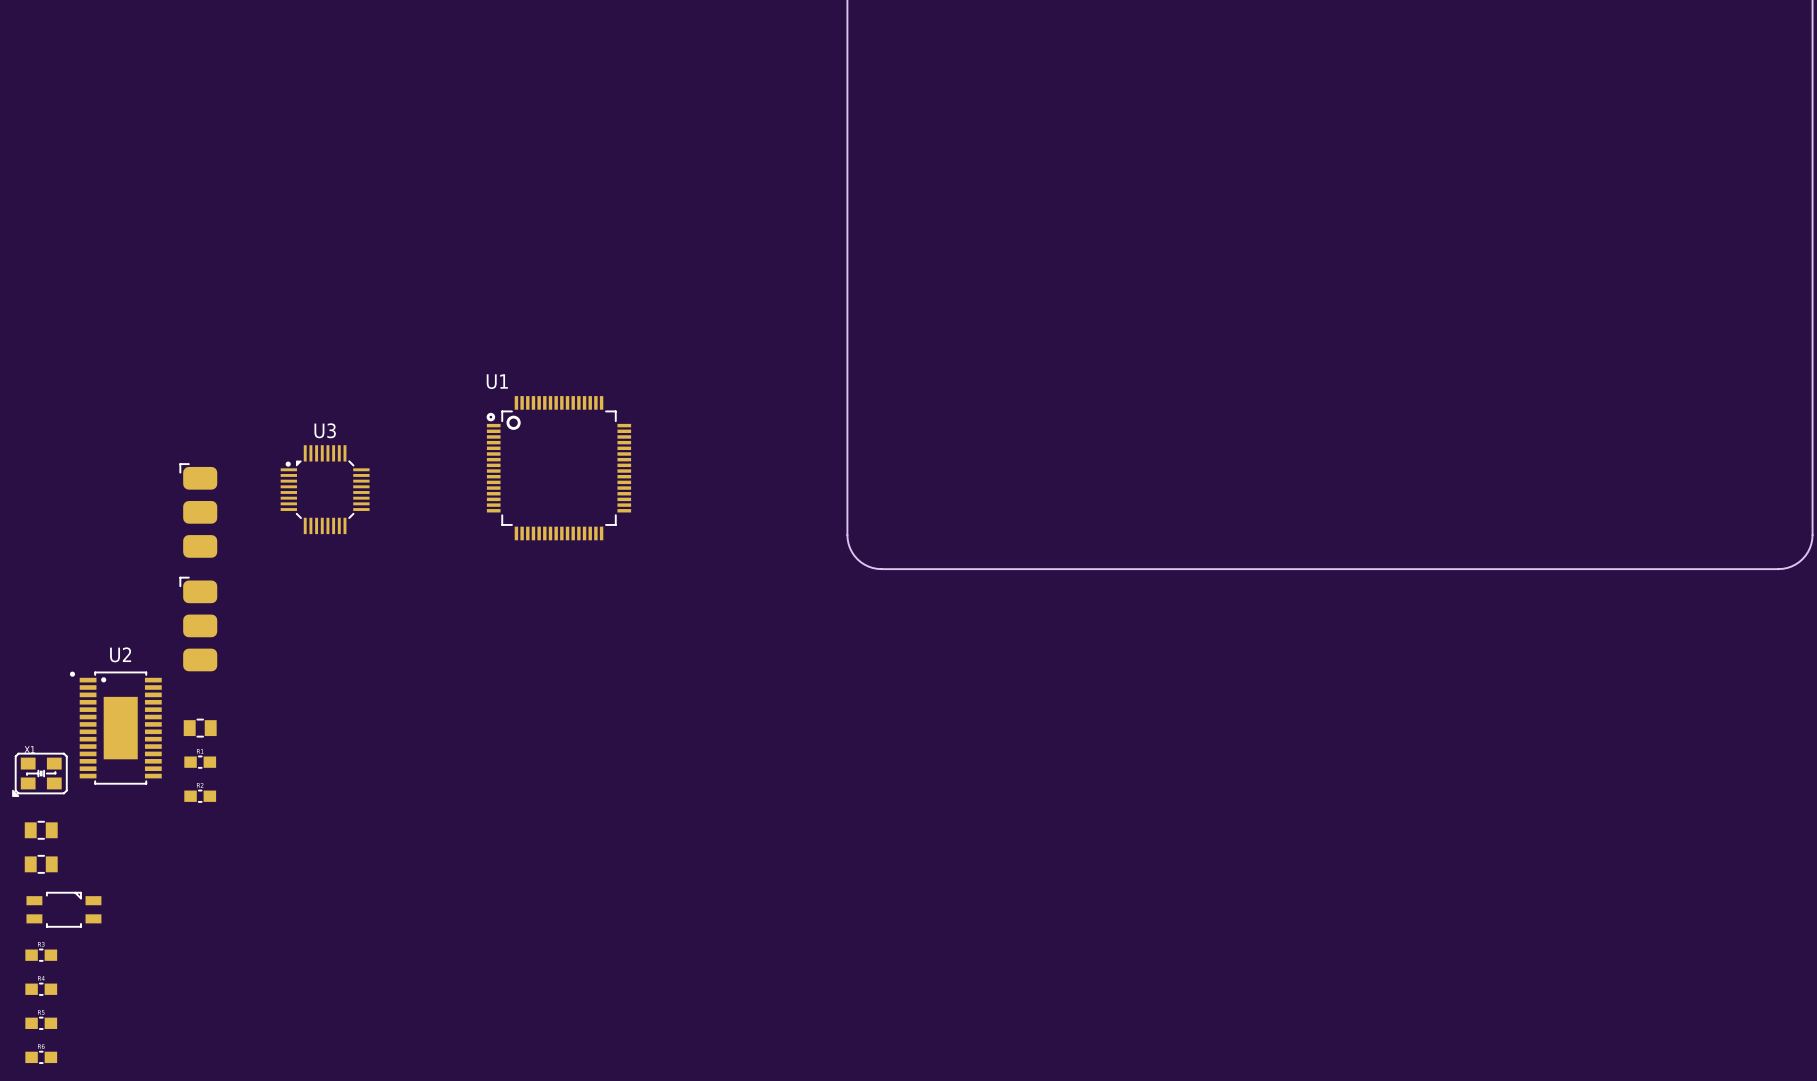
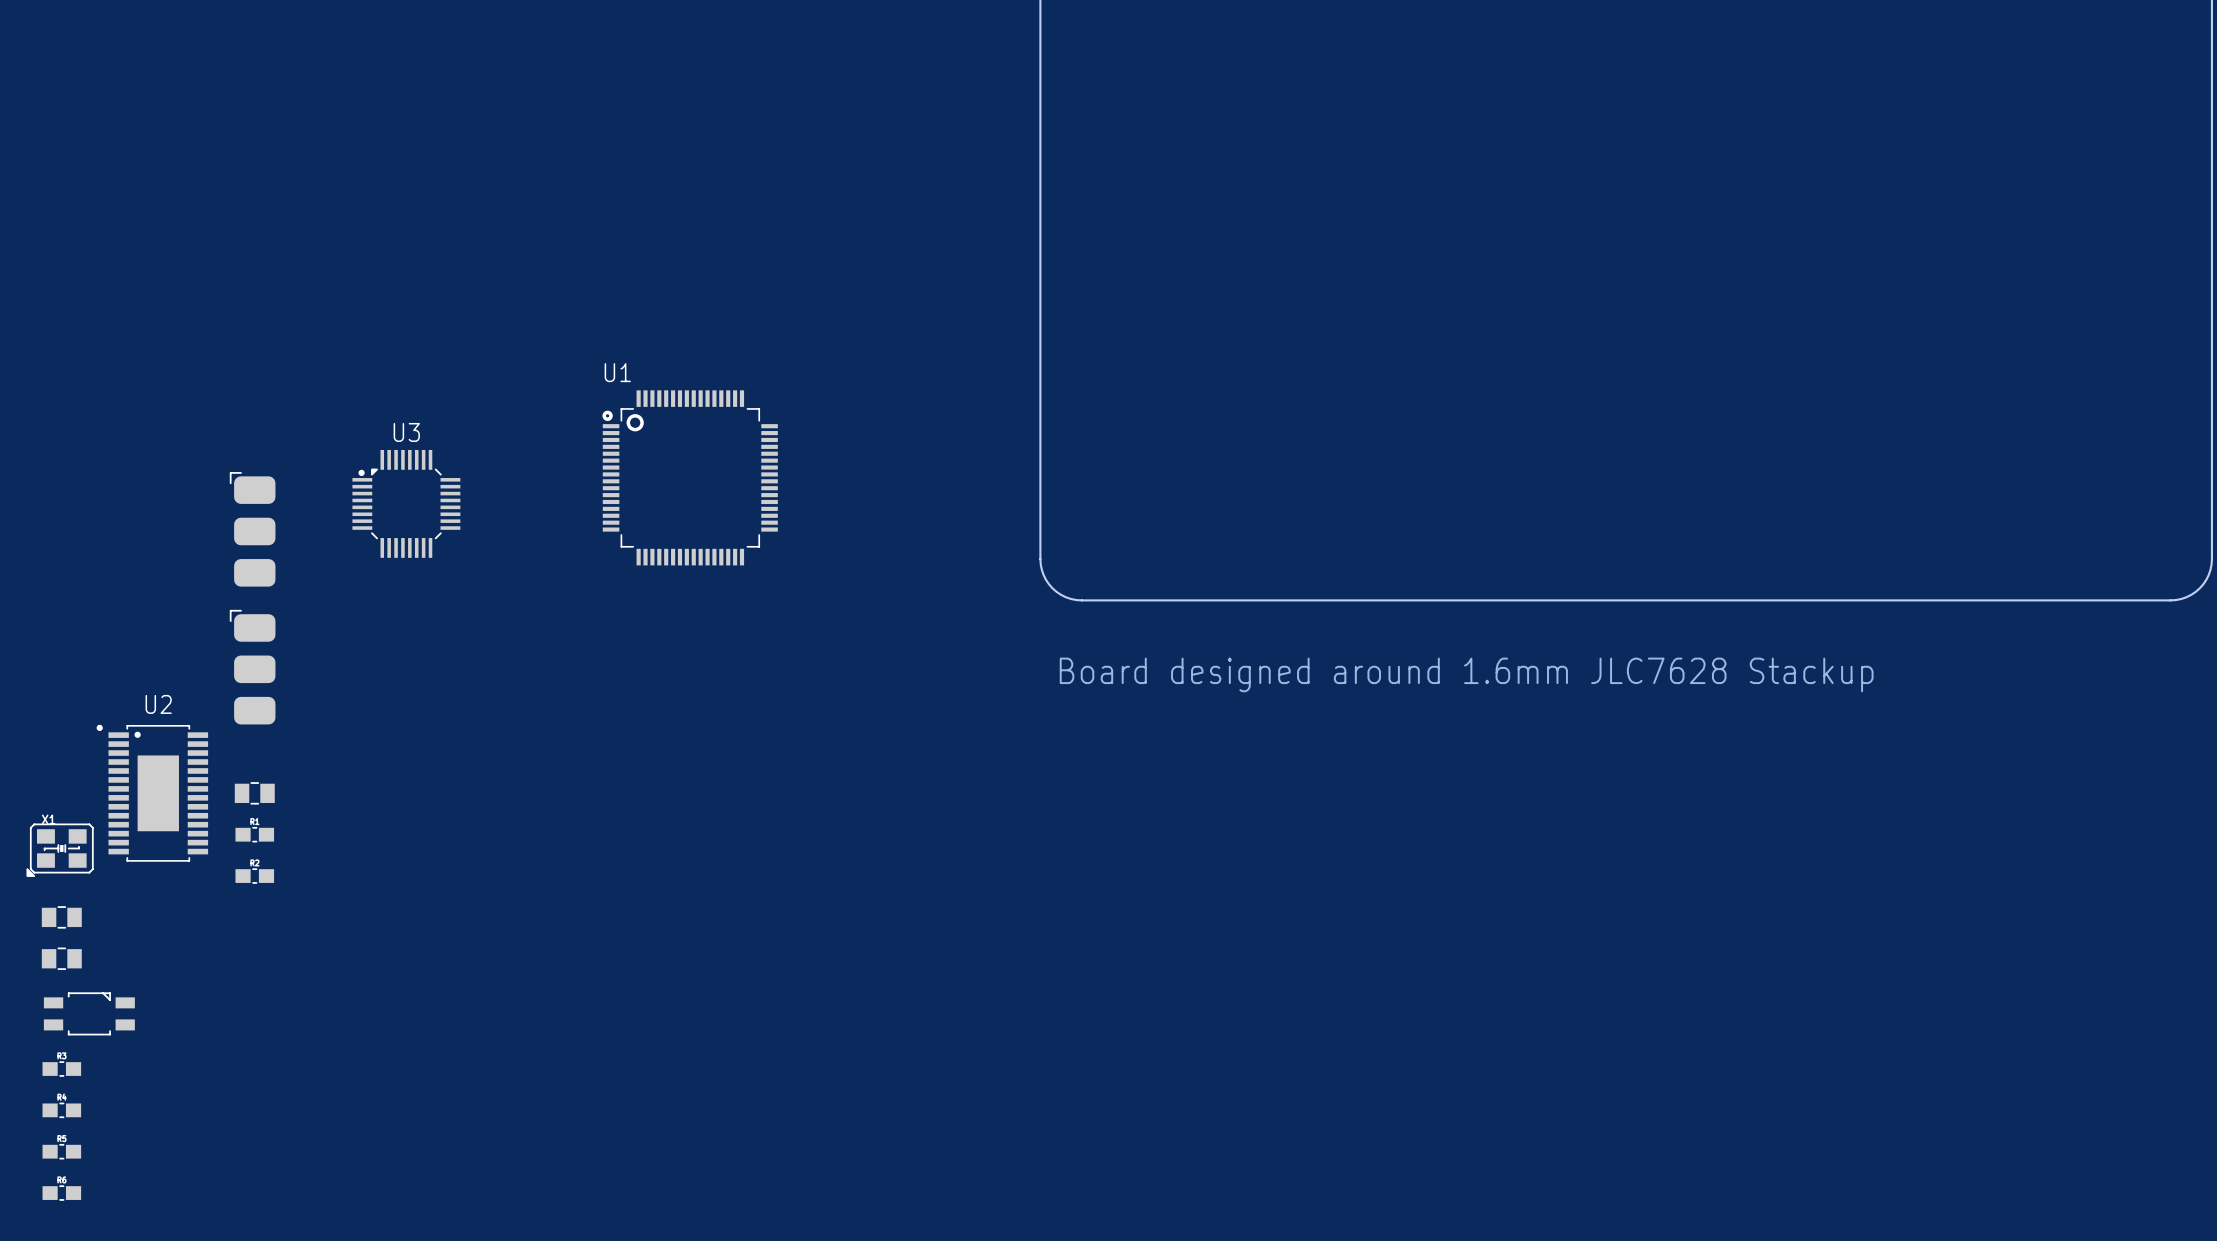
text: none -> Board designed around 1.6mm JLC7628 Stackup (1466, 674)

